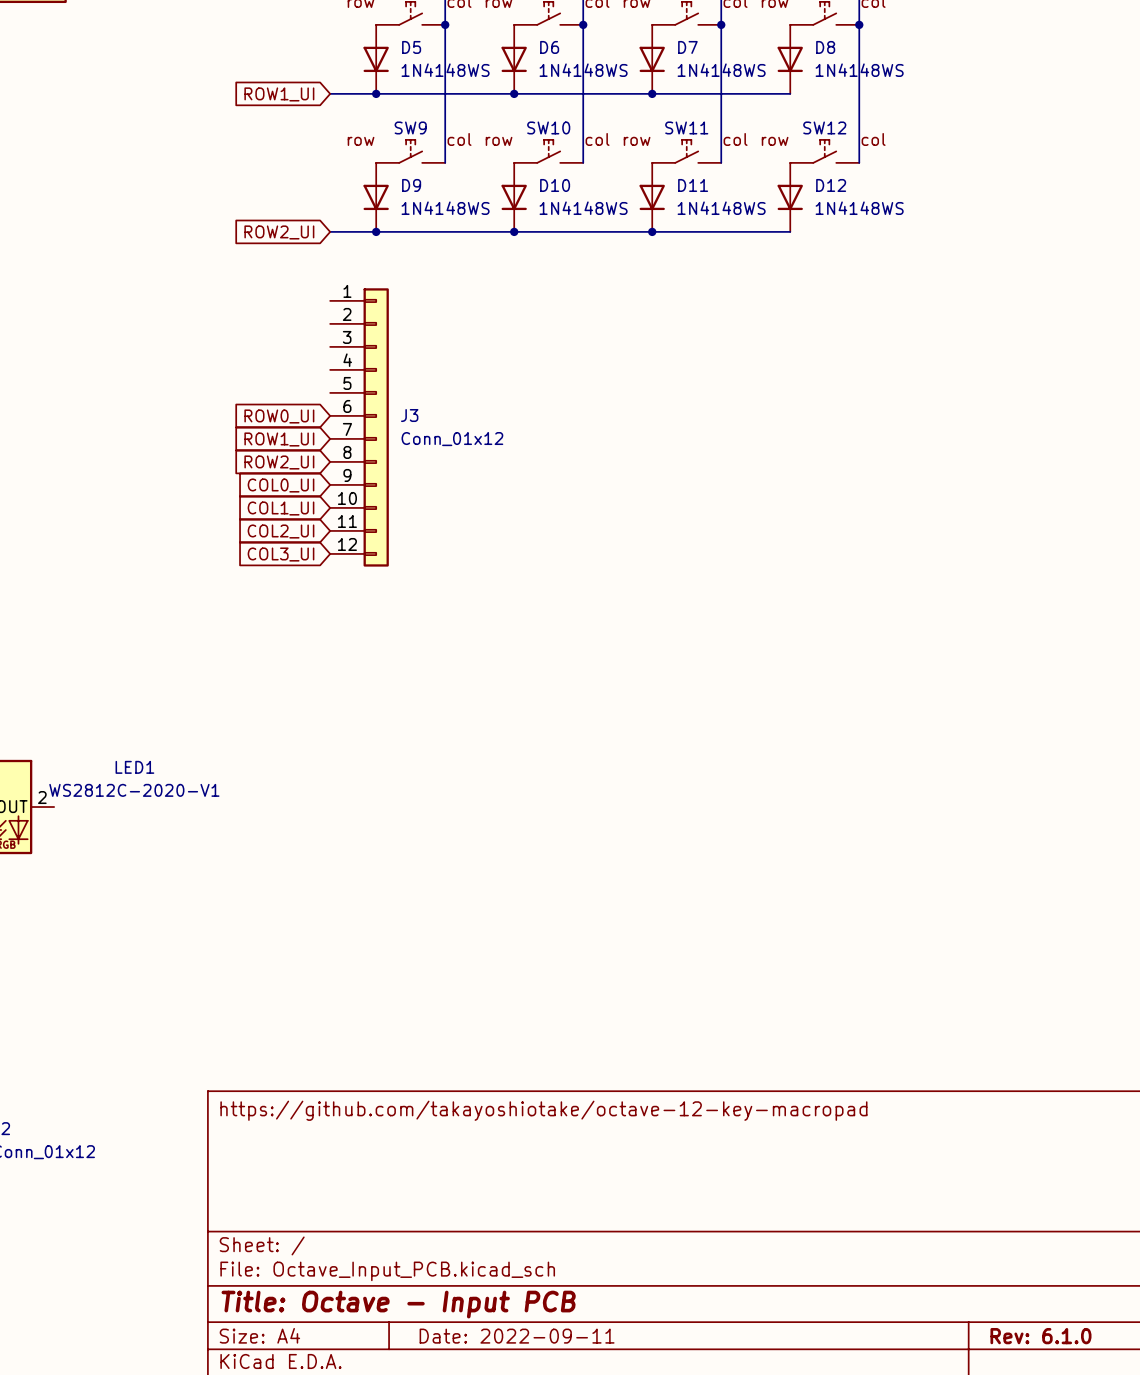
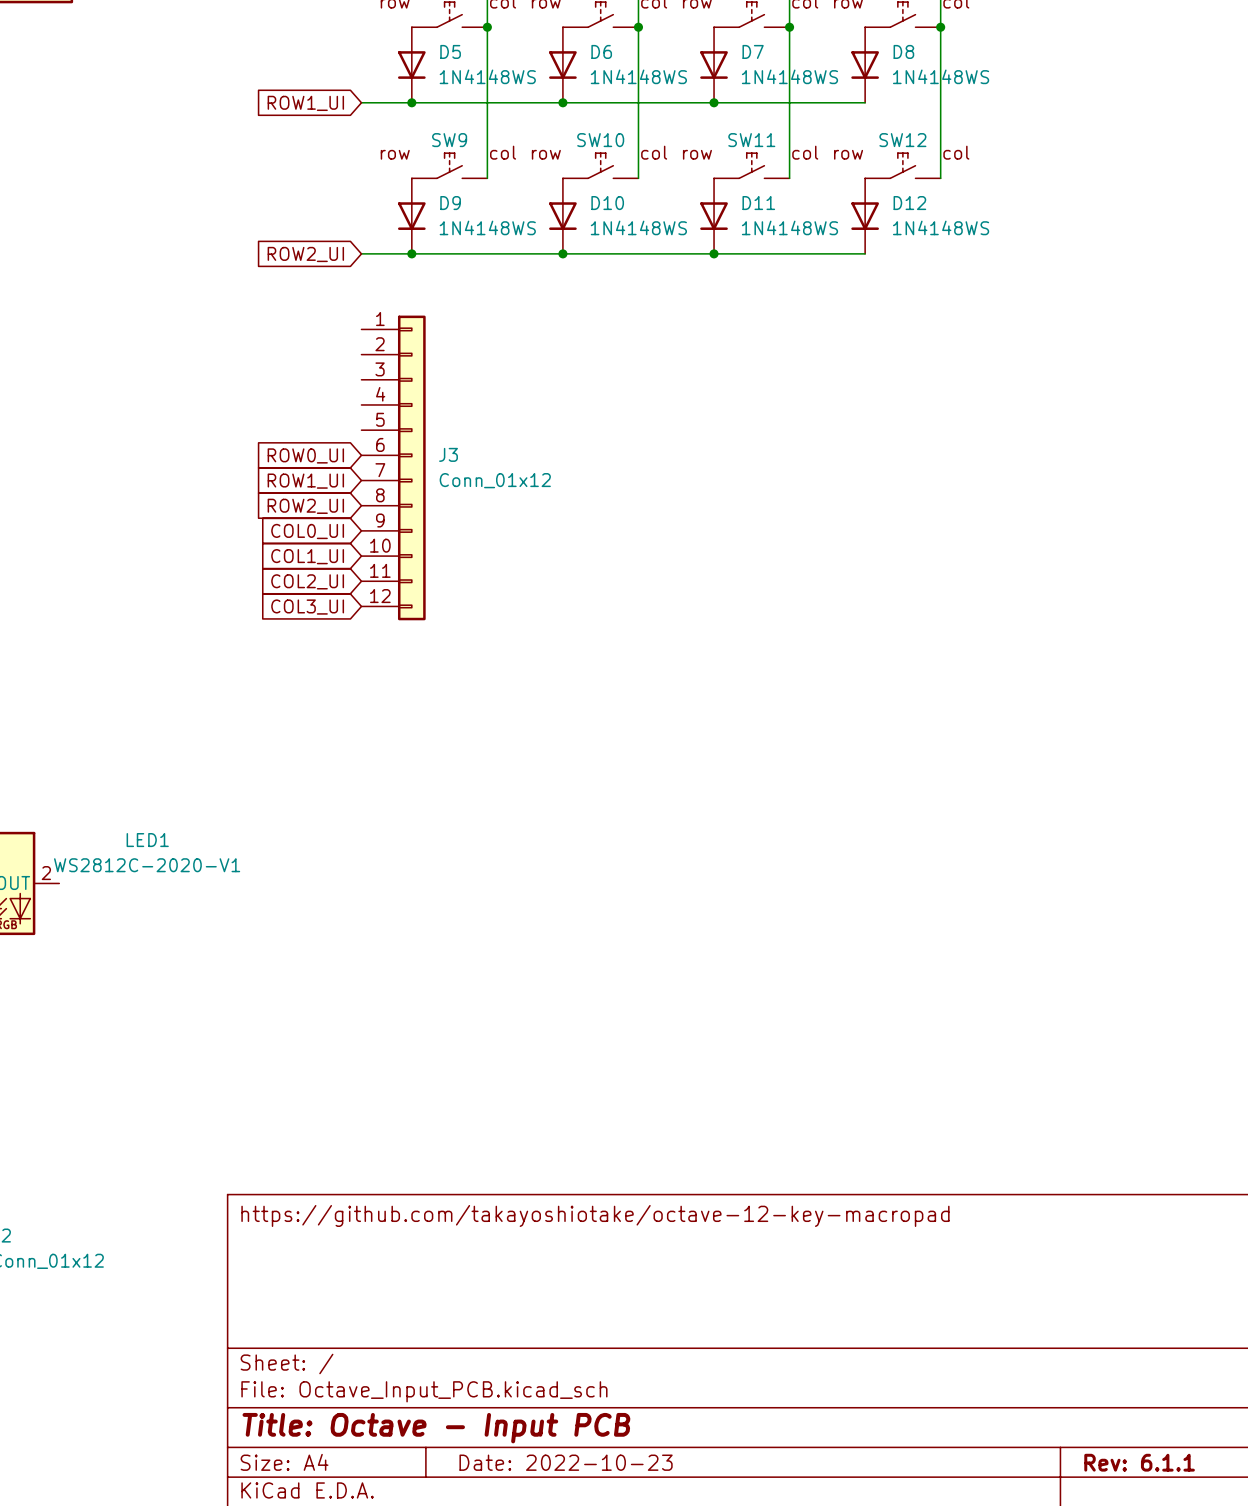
title block: Date: 2022-09-11 (517, 1336) -> Date: 2022-10-23 (566, 1462)
title block: Rev: 6.1.0 (1040, 1336) -> Rev: 6.1.1 (1139, 1462)

